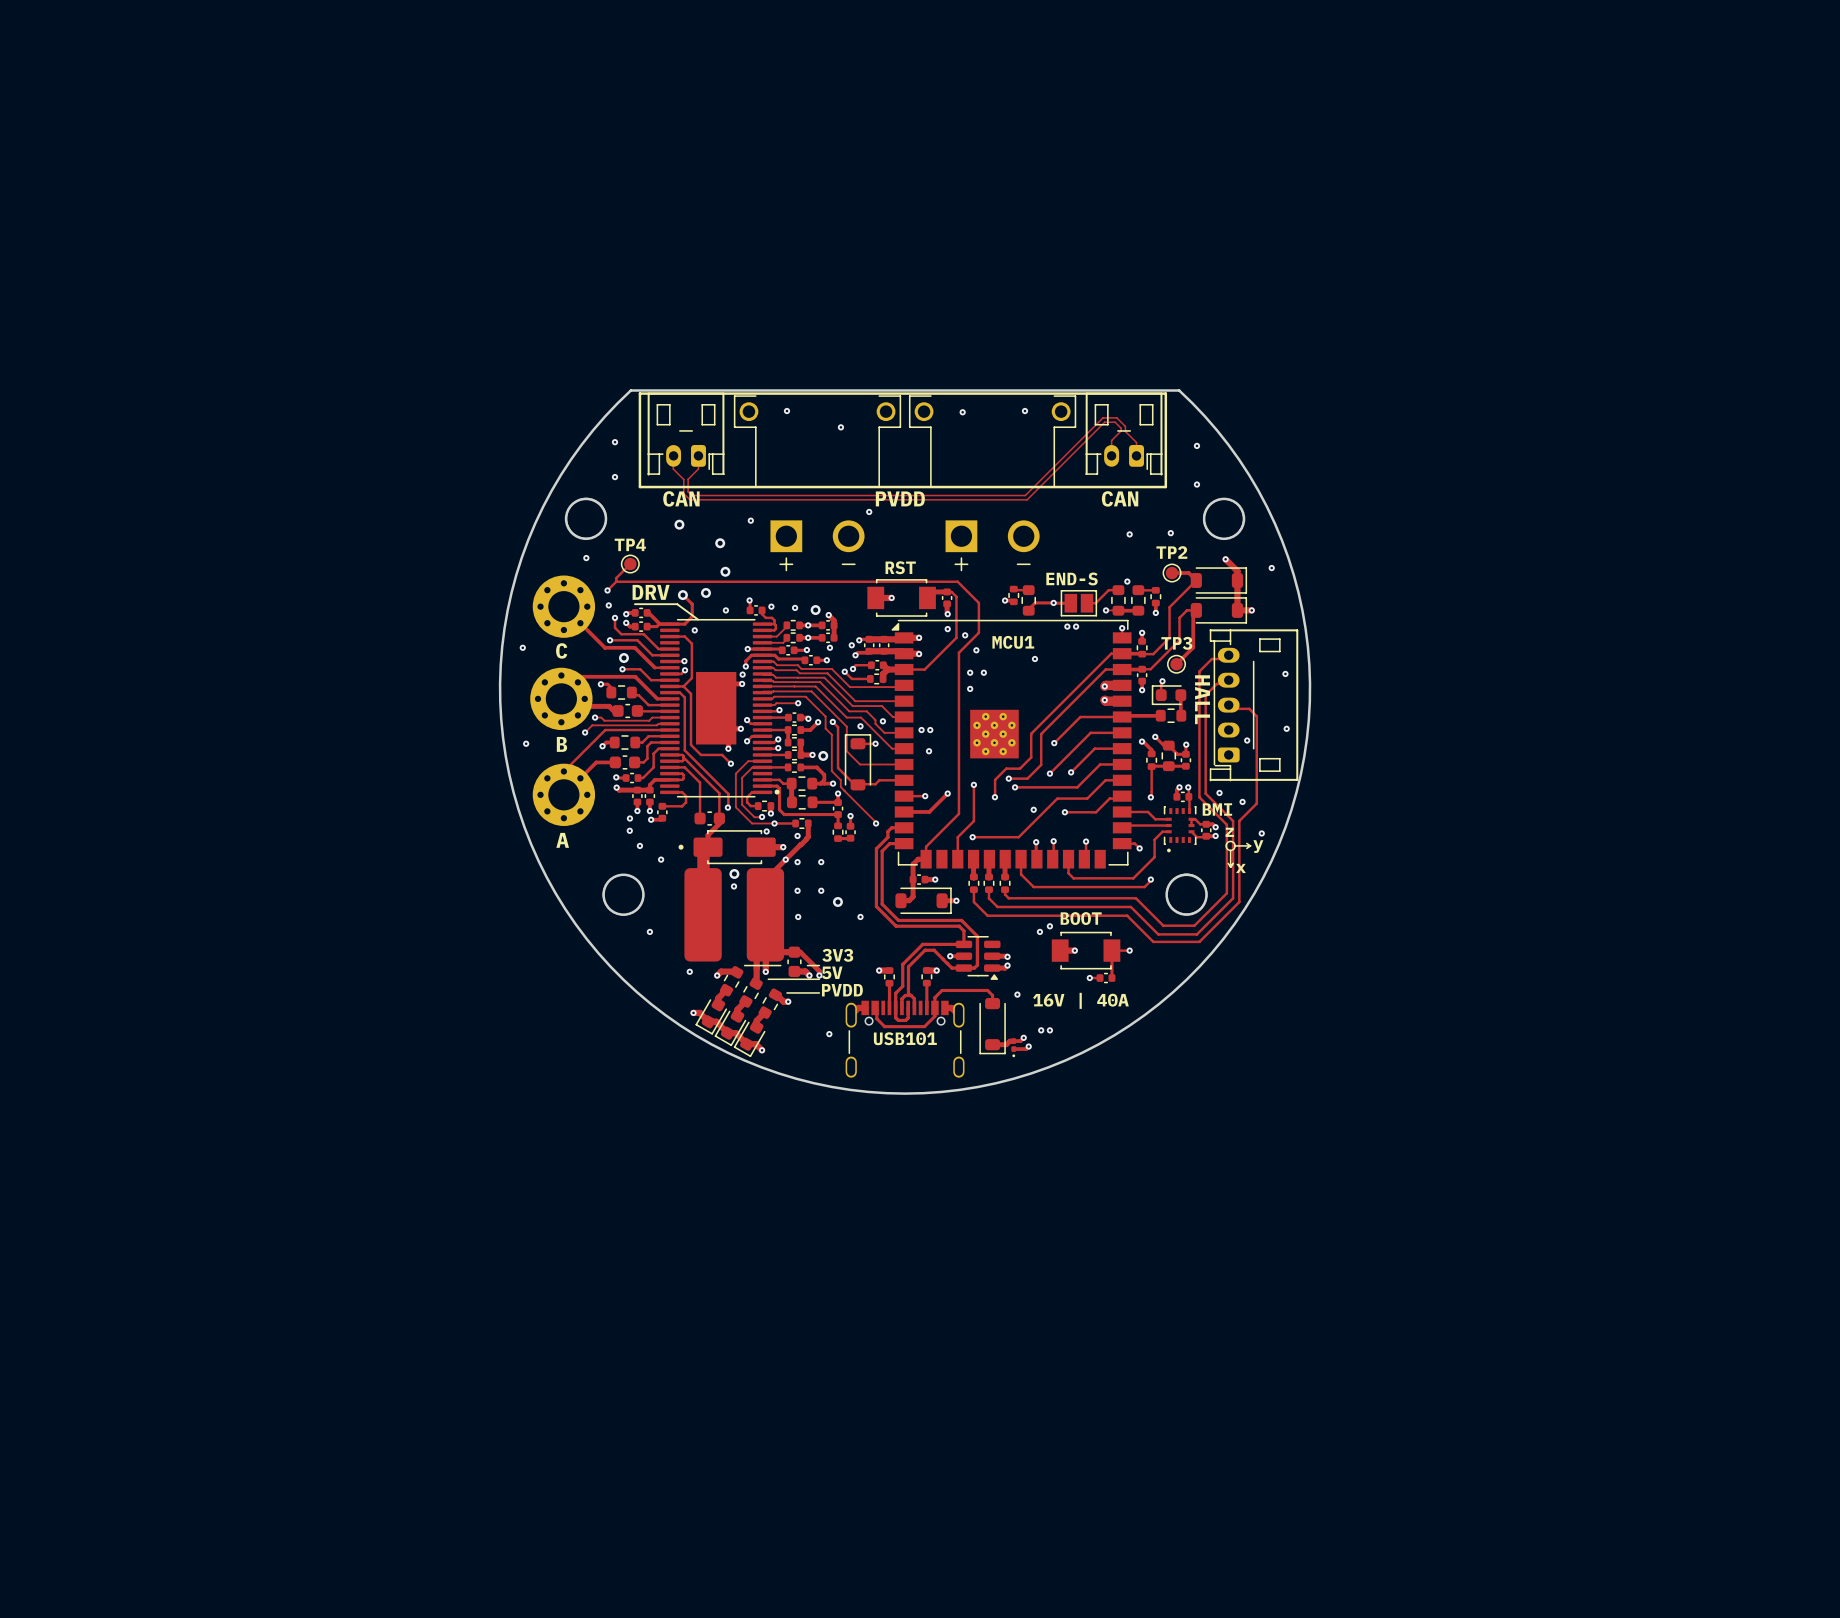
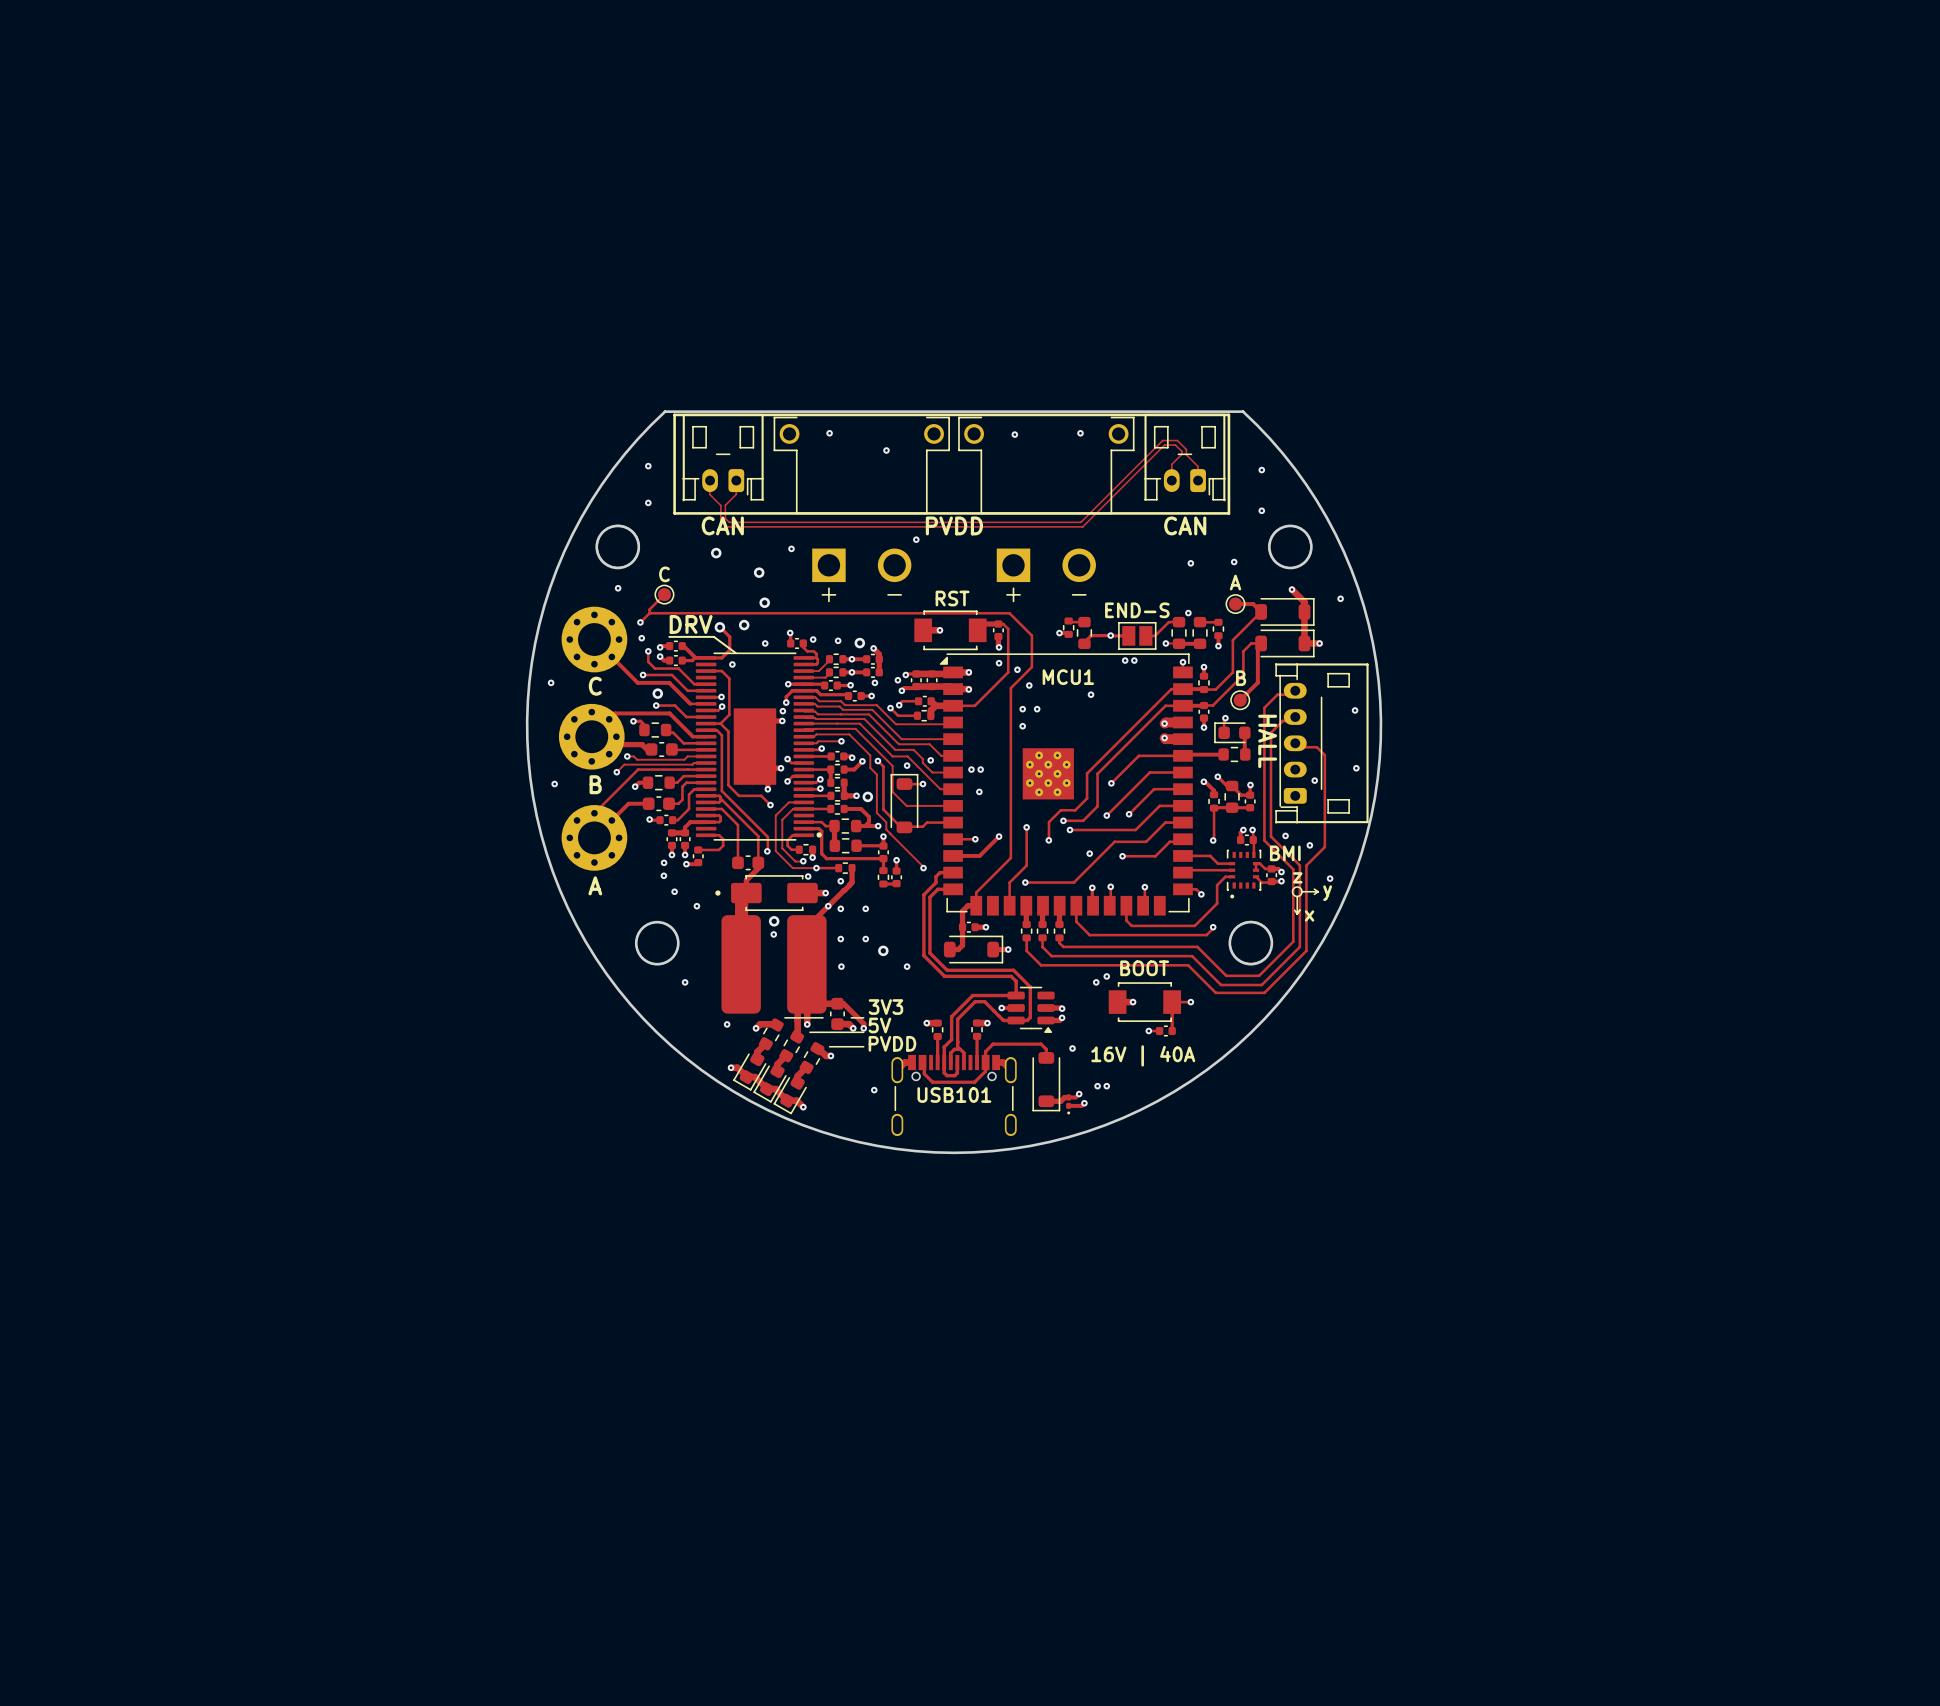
TP4 name: TP4 (630, 544) -> C (664, 574)
TP2 name: TP2 (1171, 552) -> A (1235, 582)
TP3 name: TP3 (1176, 643) -> B (1241, 678)
track: (616, 787) (619, 790) (637, 790) -> none
via: (616, 787) -> none

